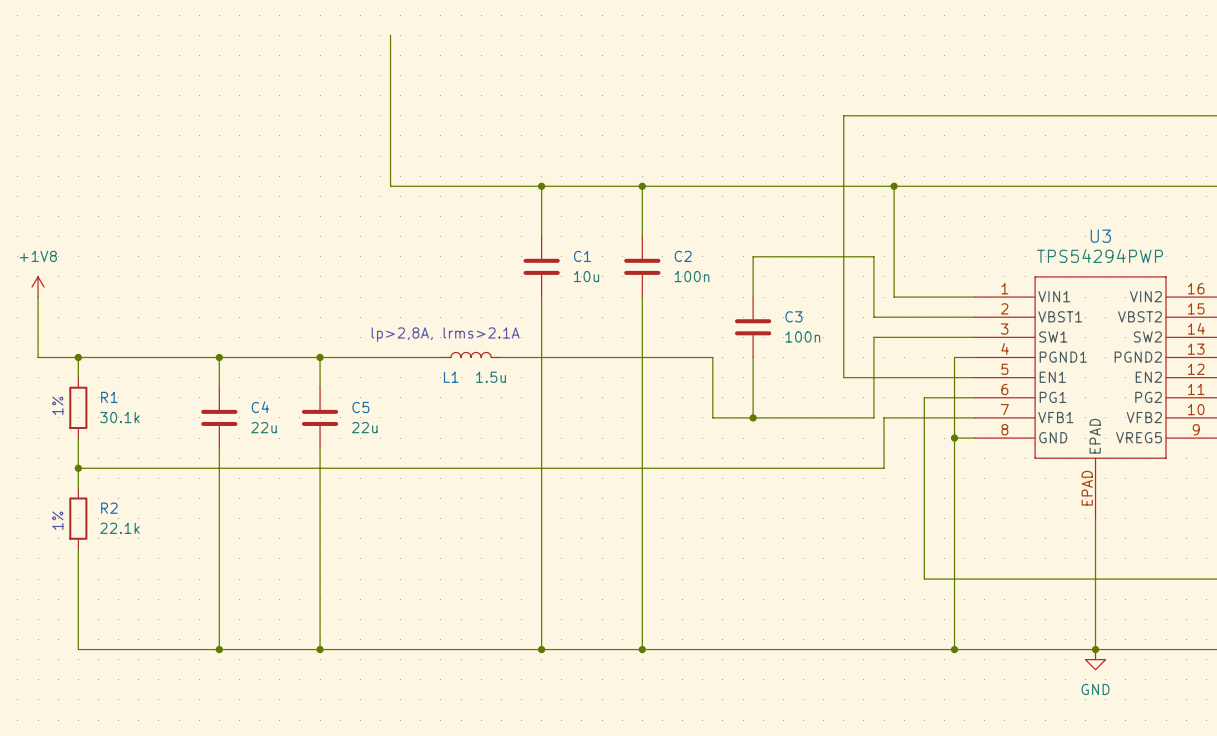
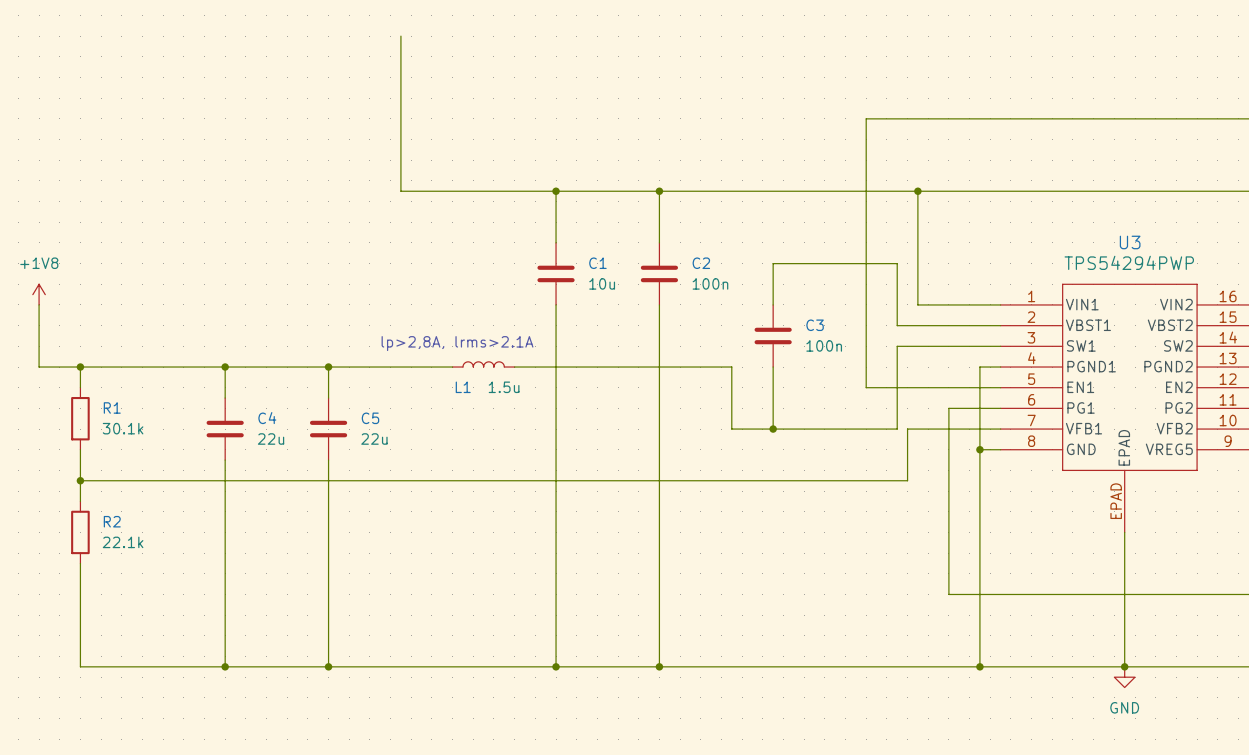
text: 1% (57, 405) -> none
text: 1% (57, 520) -> none

